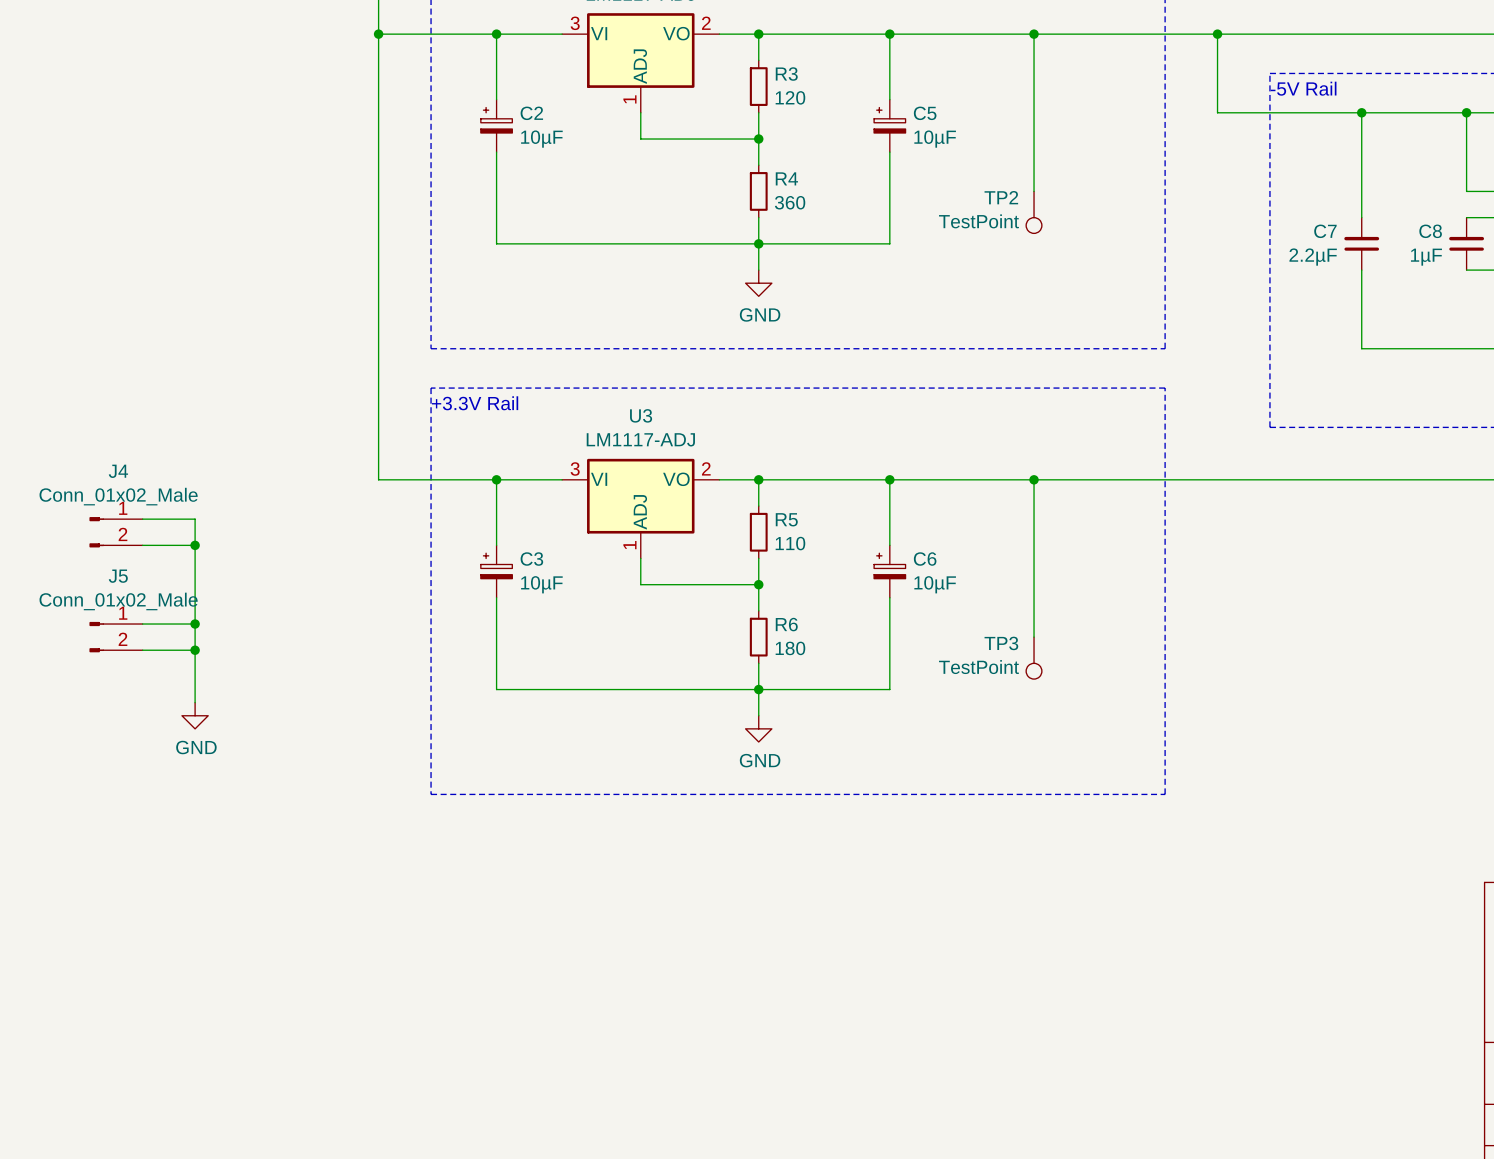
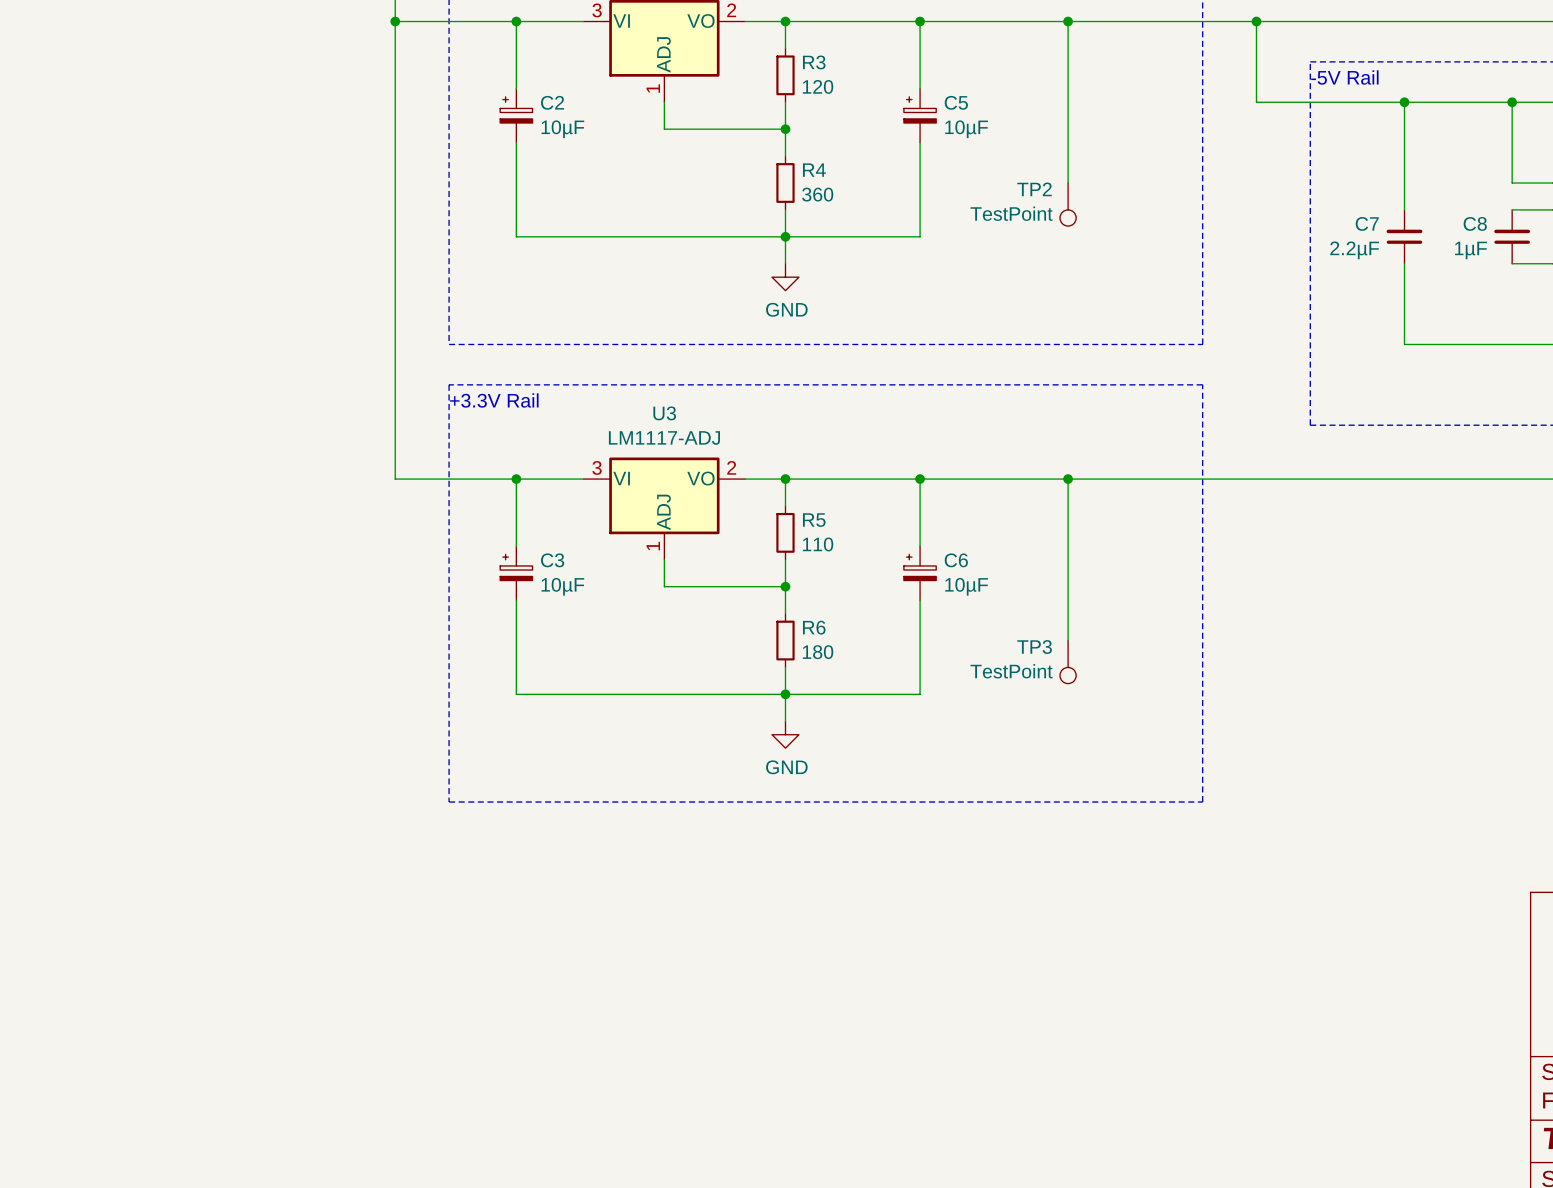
wire: (142, 519) (195, 519) (195, 702) -> none
J4: Conn_01x02_Male (116, 532) -> none
wire: (142, 545) (195, 545) -> none
junction: (195, 545) -> none
wire: (142, 624) (195, 624) -> none
junction: (195, 624) -> none
J5: Conn_01x02_Male (116, 637) -> none
wire: (142, 650) (195, 650) -> none
junction: (195, 650) -> none
power symbol: GND (195, 715) -> none

